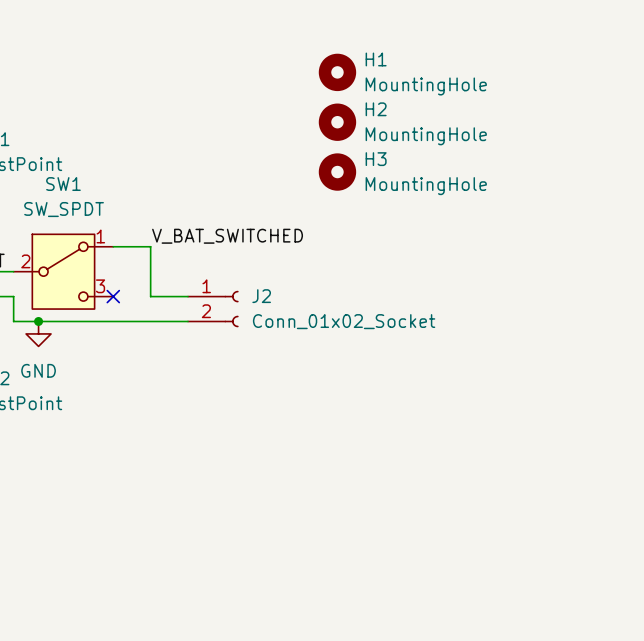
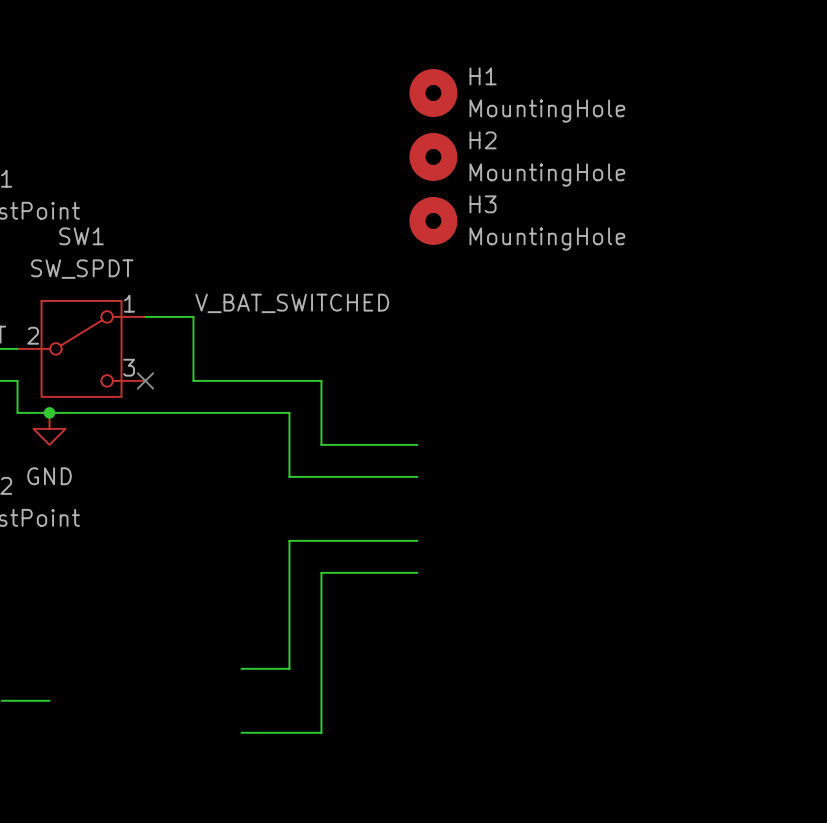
wire: none -> (241, 380) (321, 380) (321, 444) (417, 444)
J2: Conn_01x02_Socket (213, 309) -> none
wire: none -> (241, 412) (289, 412) (289, 476) (417, 476)
wire: none -> (417, 540) (289, 540) (289, 668) (241, 668)
wire: none -> (417, 572) (321, 572) (321, 732) (241, 732)
wire: none -> (1, 700) (49, 700)

